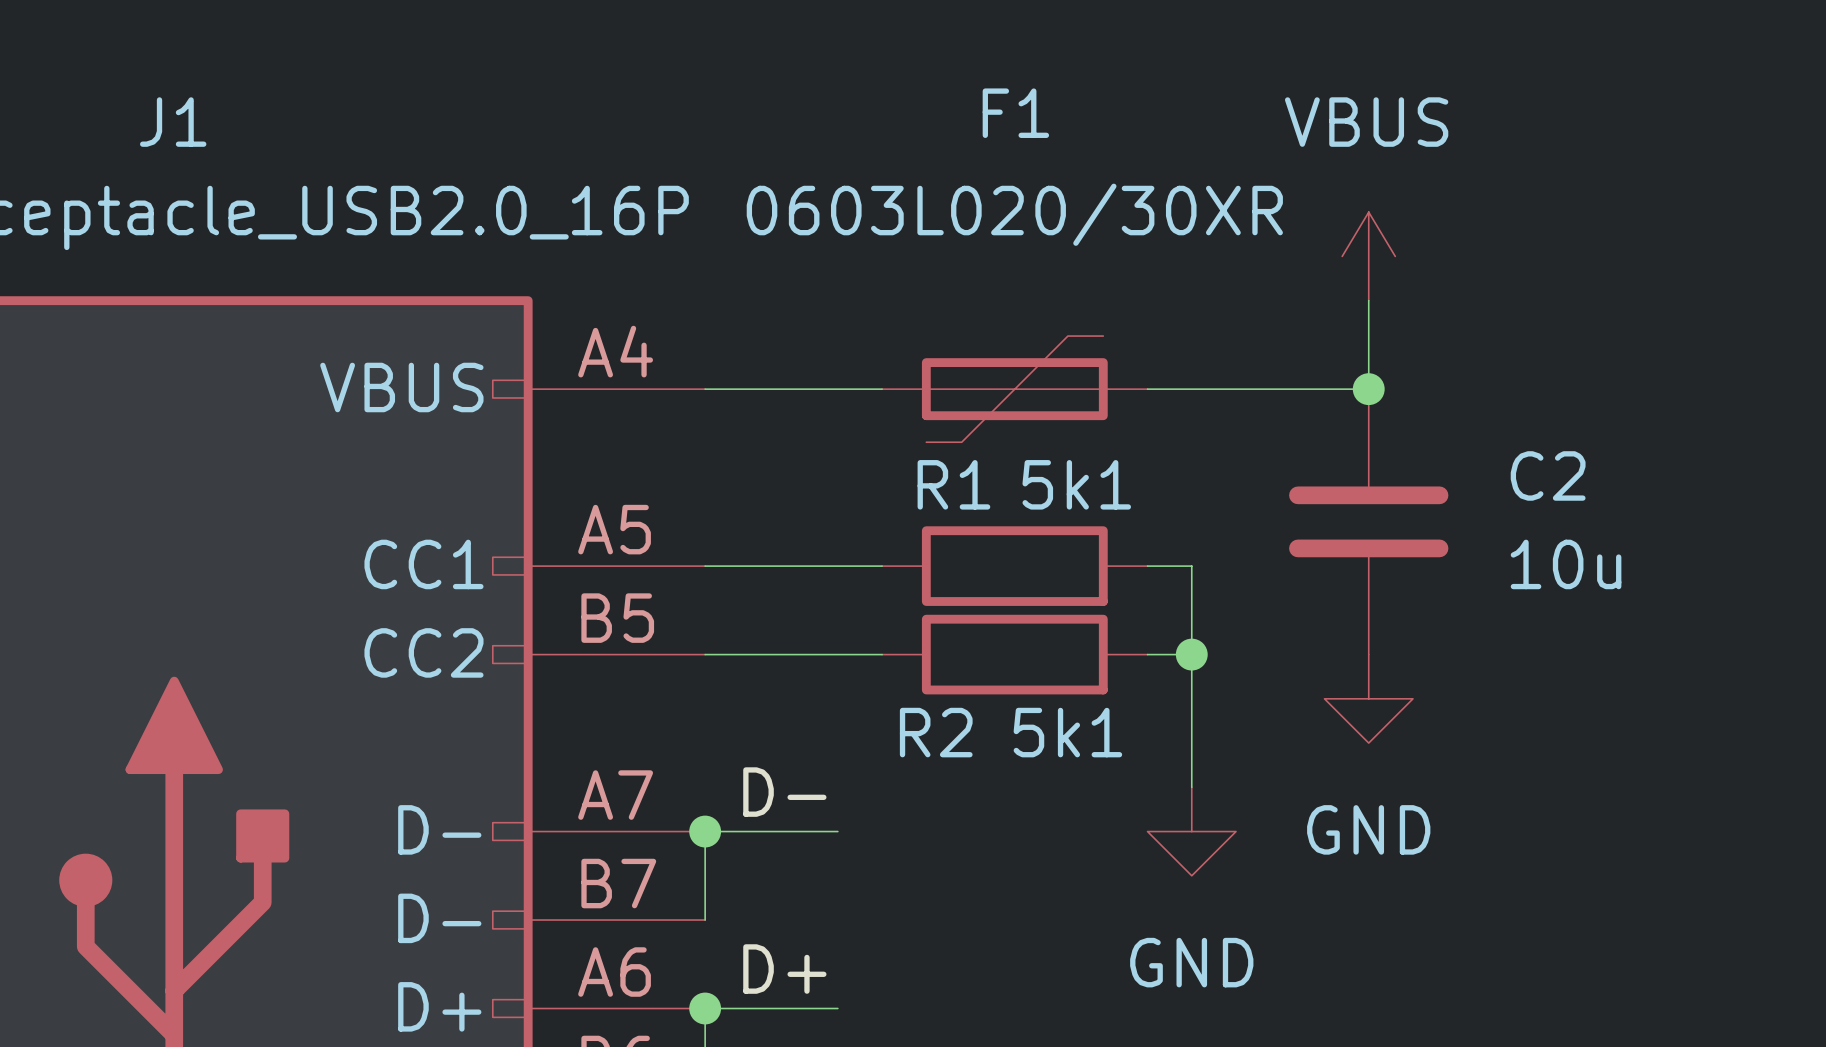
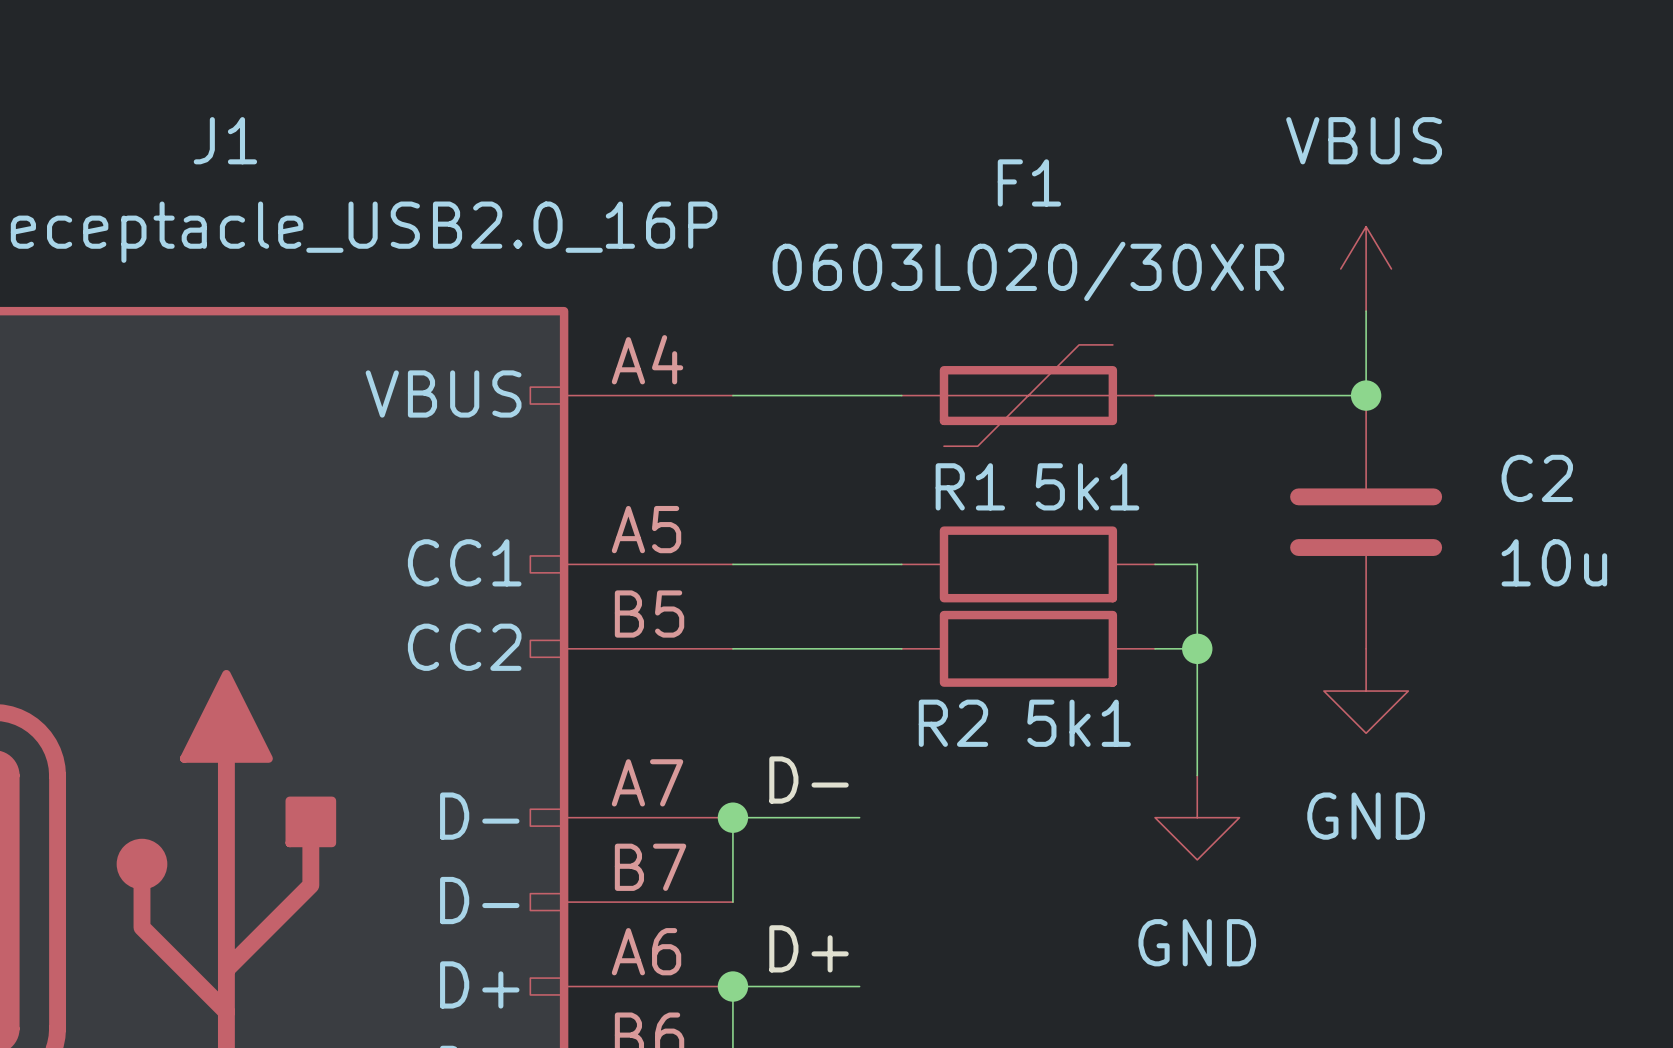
F1 name position: F1 (1015, 113) -> F1 (1029, 182)
F1 value position: 0603L020/30XR (1014, 214) -> 0603L020/30XR (1028, 271)

